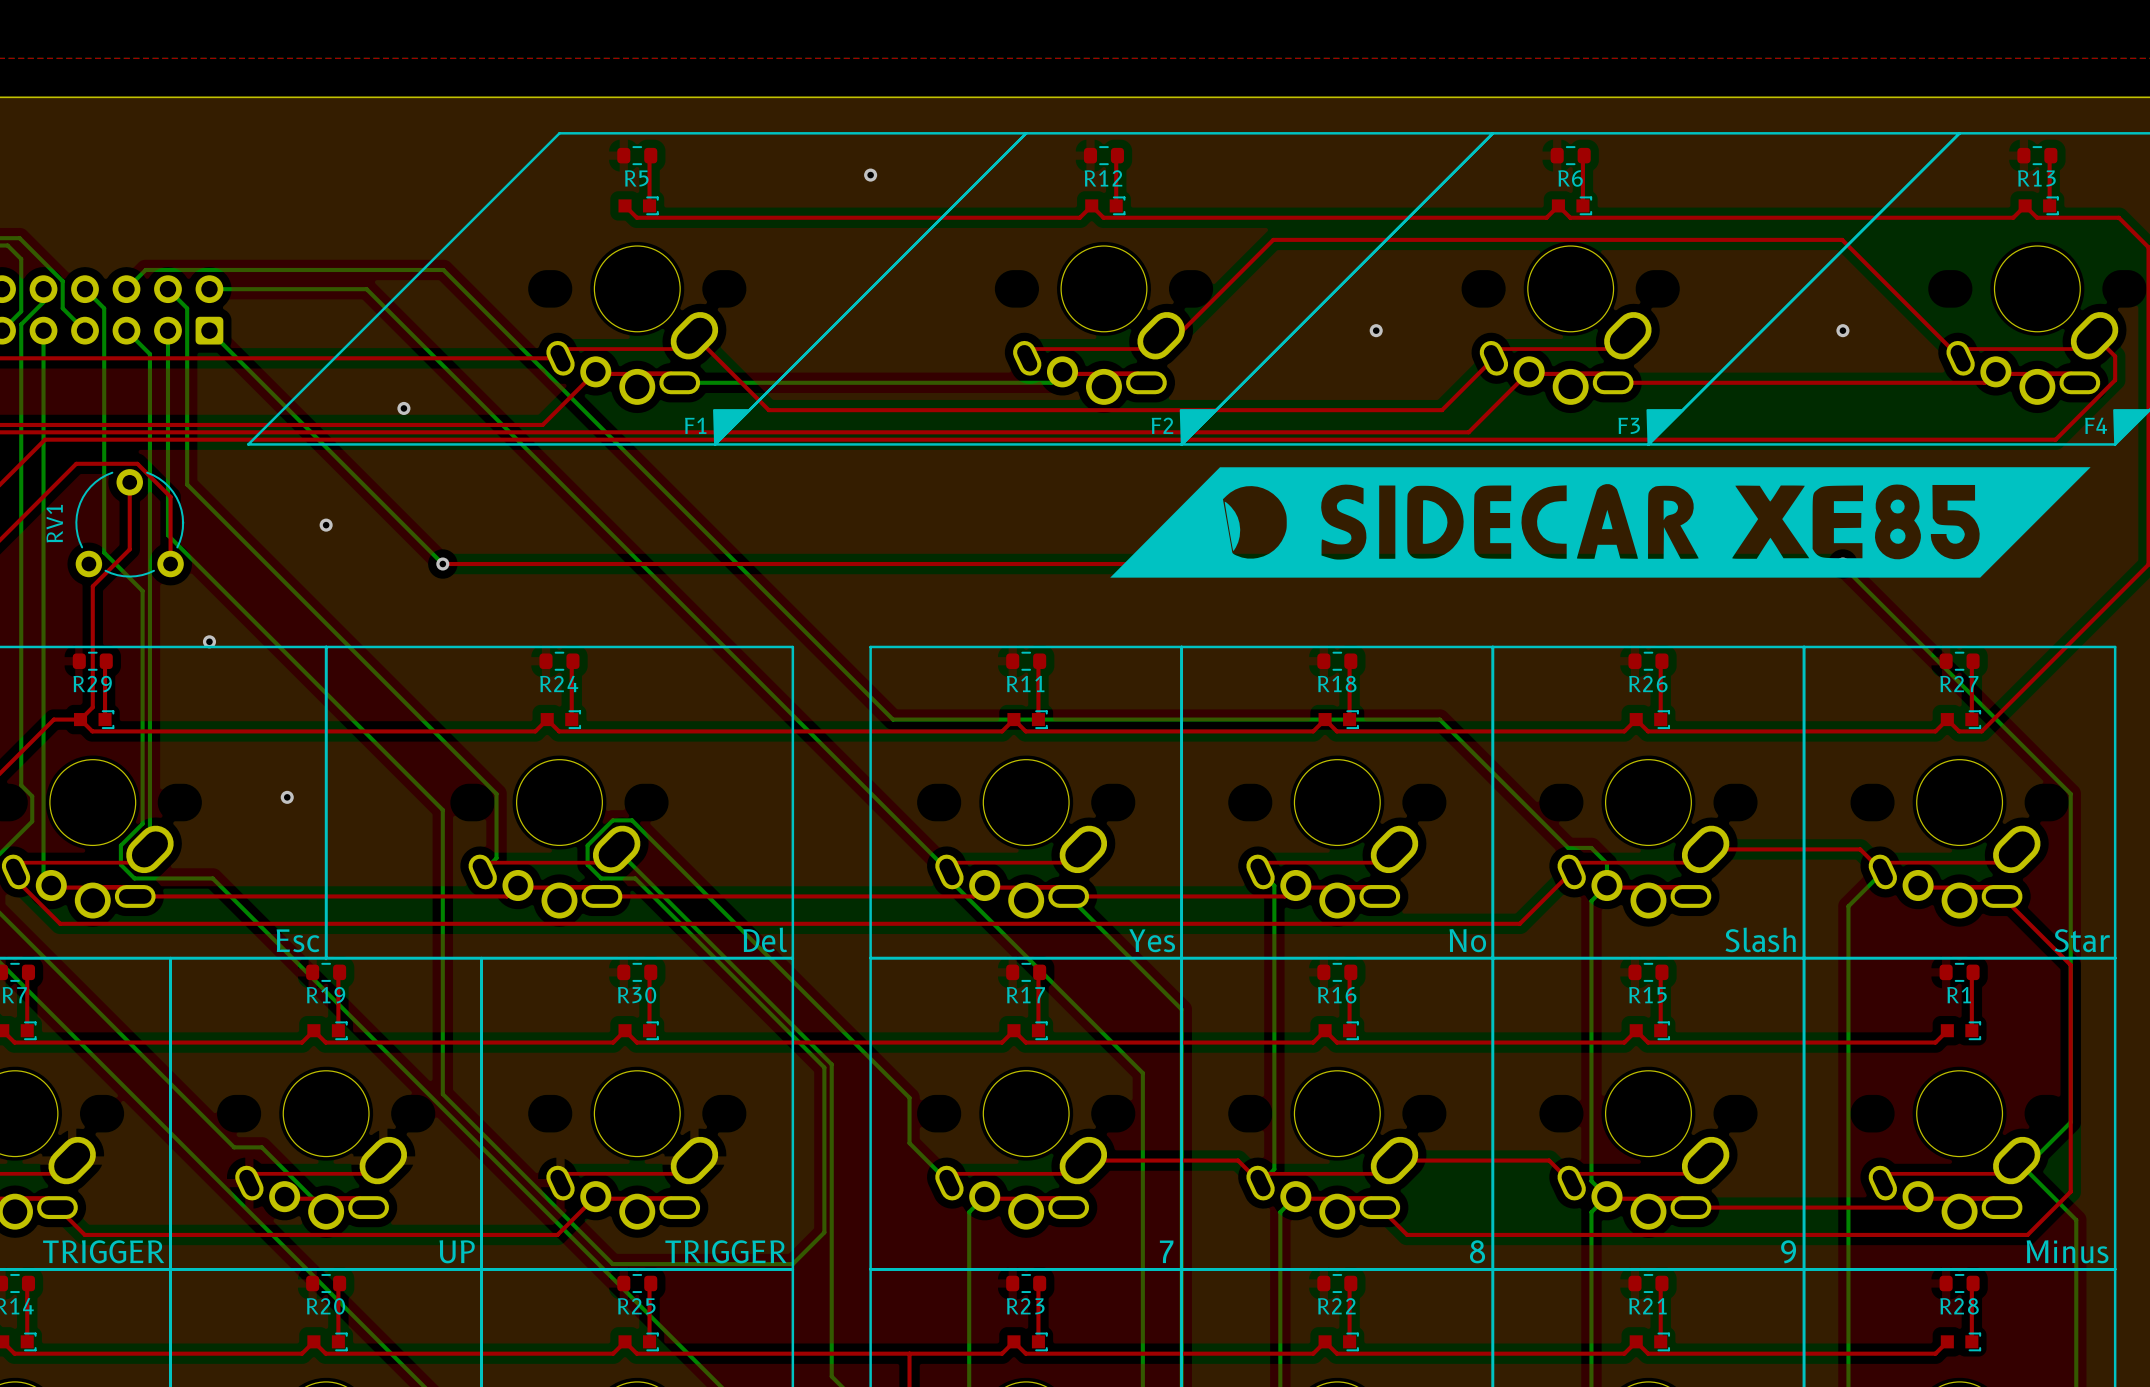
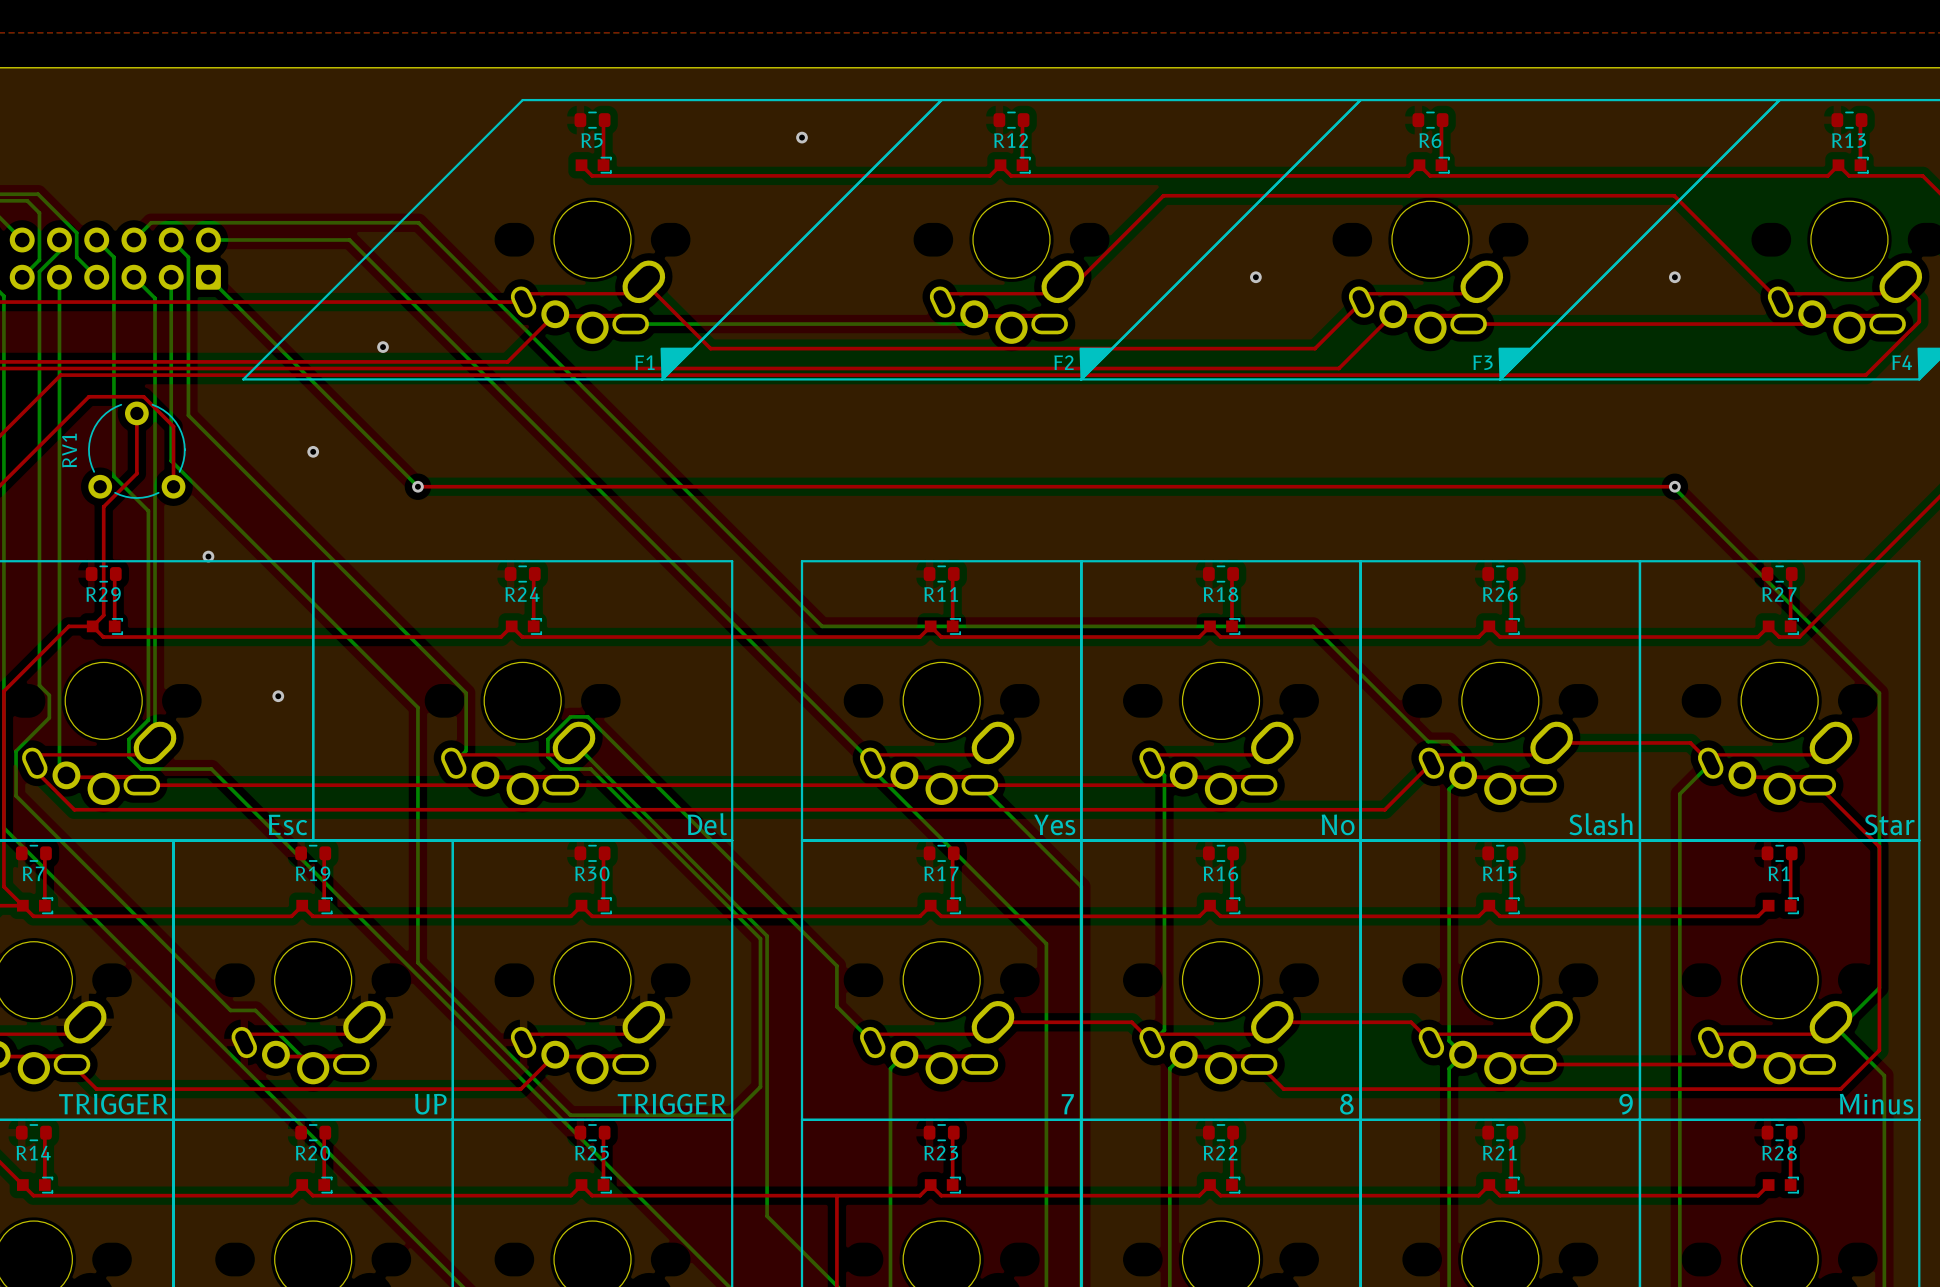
drawing: [1110, 467, 2091, 578] -> none

